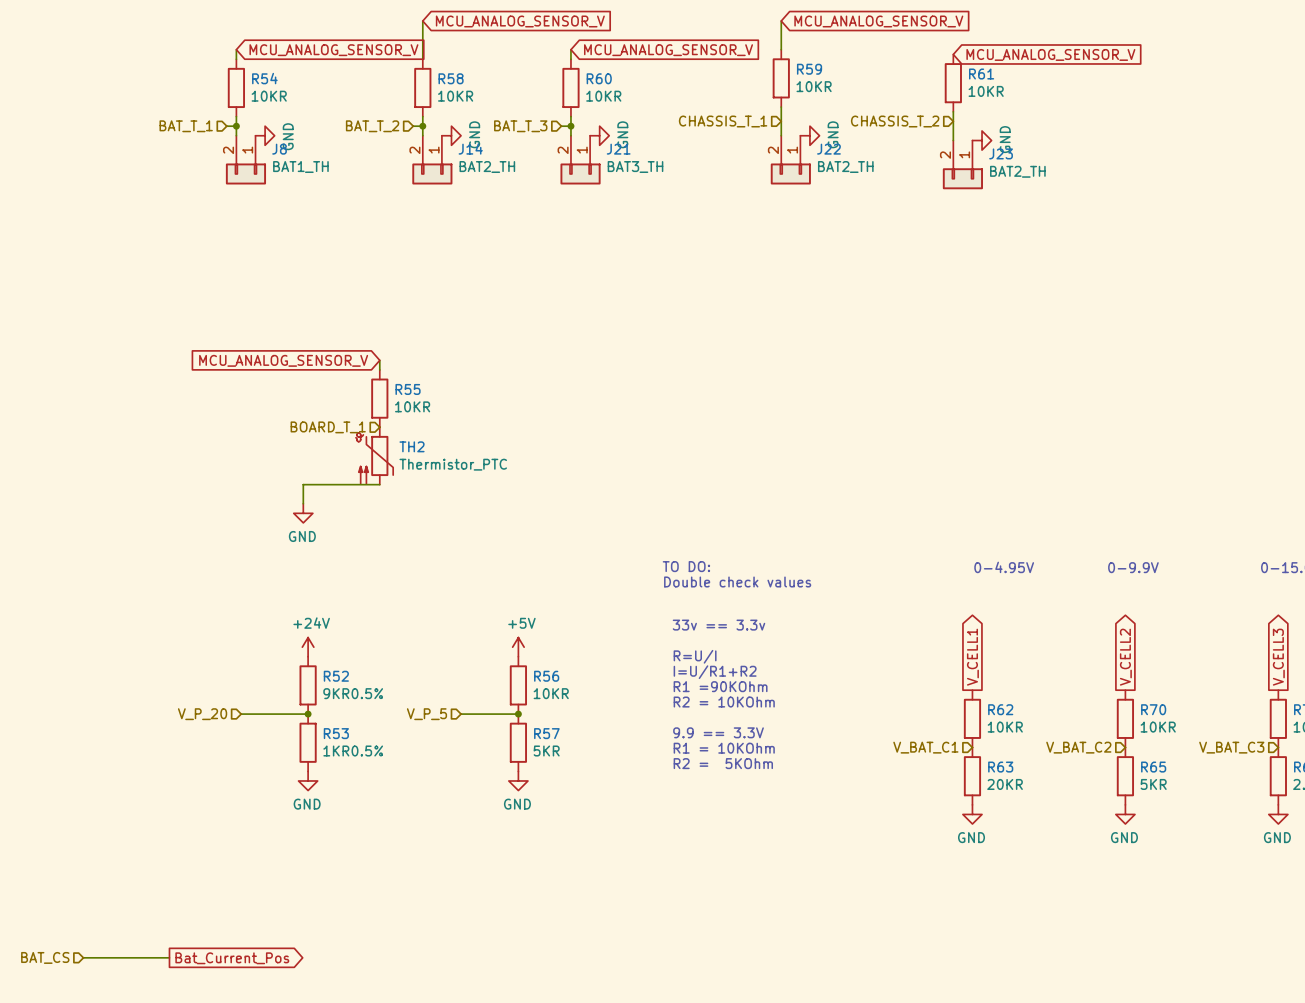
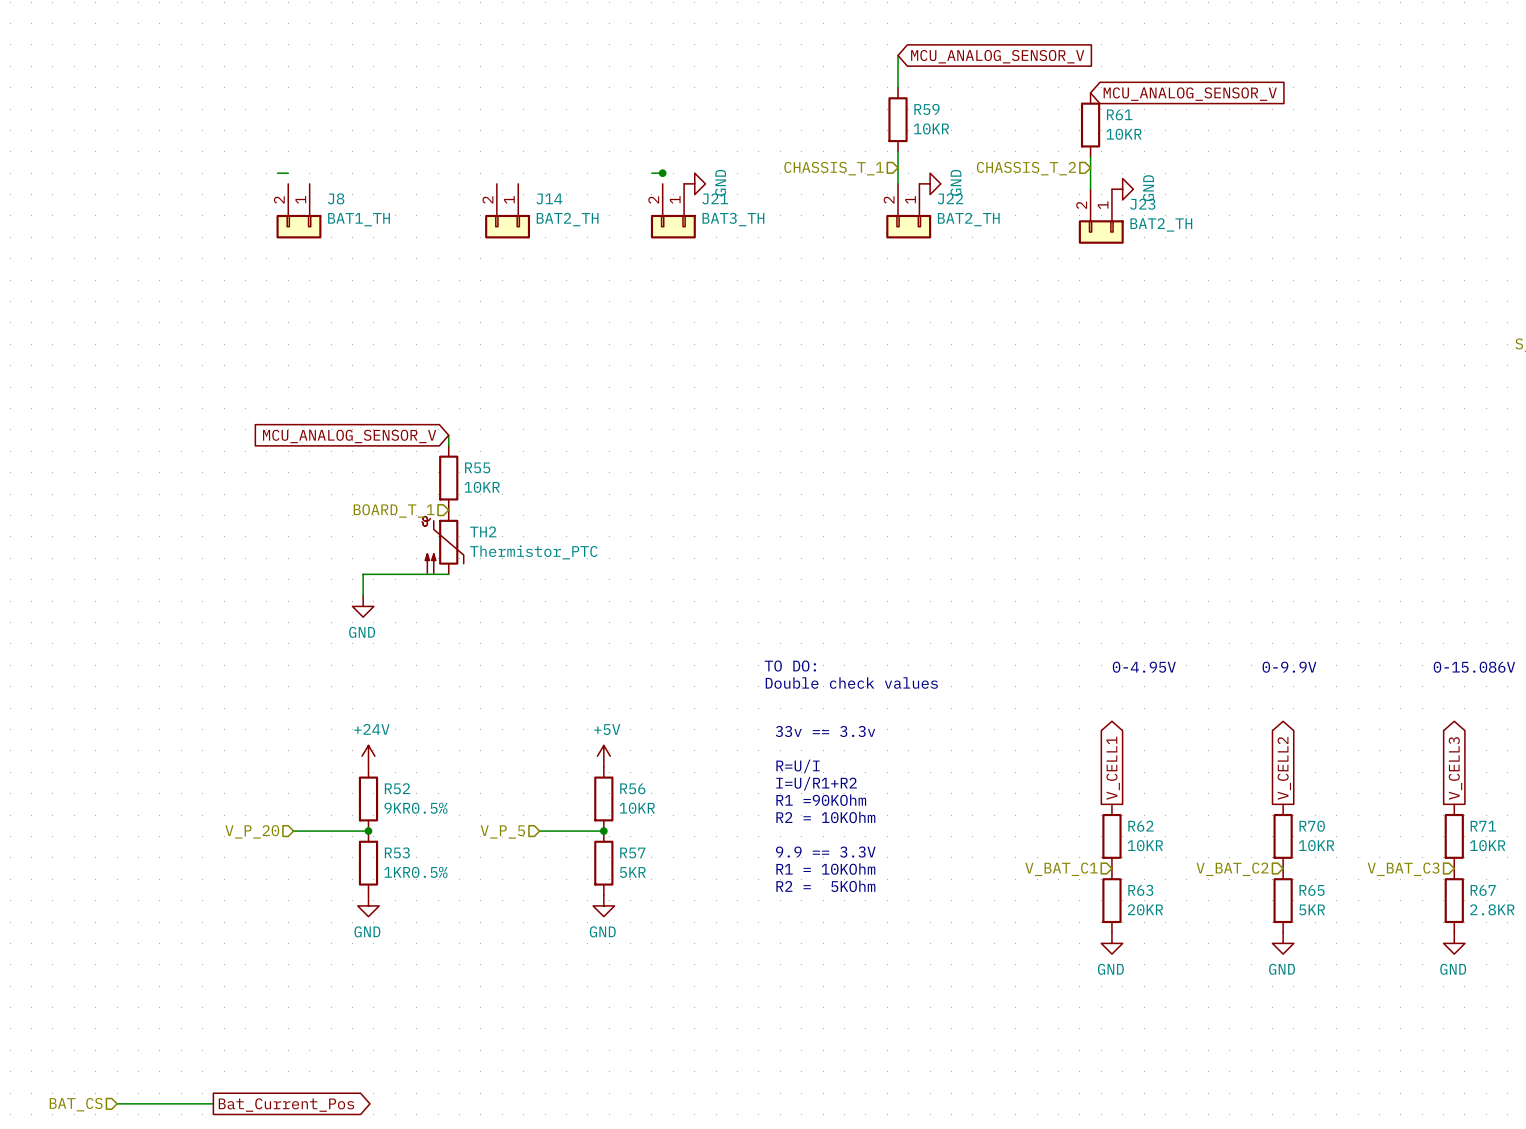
wire: (422, 21) (422, 59) -> none
global label: MCU_ANALOG_SENSOR_V (520, 21) -> none
wire: (236, 49) (236, 59) -> none
wire: (570, 49) (570, 59) -> none
global label: MCU_ANALOG_SENSOR_V (333, 50) -> none
global label: MCU_ANALOG_SENSOR_V (668, 50) -> none
R54: 10KR (236, 87) -> none
R58: 10KR (422, 87) -> none
R60: 10KR (570, 87) -> none
wire: (236, 116) (236, 135) -> none
wire: (422, 116) (422, 135) -> none
wire: (570, 116) (570, 135) -> none
hierarchical label: BAT_T_1 (186, 126) -> none
junction: (236, 126) -> none
hierarchical label: BAT_T_2 (372, 126) -> none
wire: (413, 126) (422, 126) -> none
junction: (422, 126) -> none
hierarchical label: BAT_T_3 (520, 126) -> none
power symbol: GND (265, 135) -> none
power symbol: GND (451, 135) -> none

